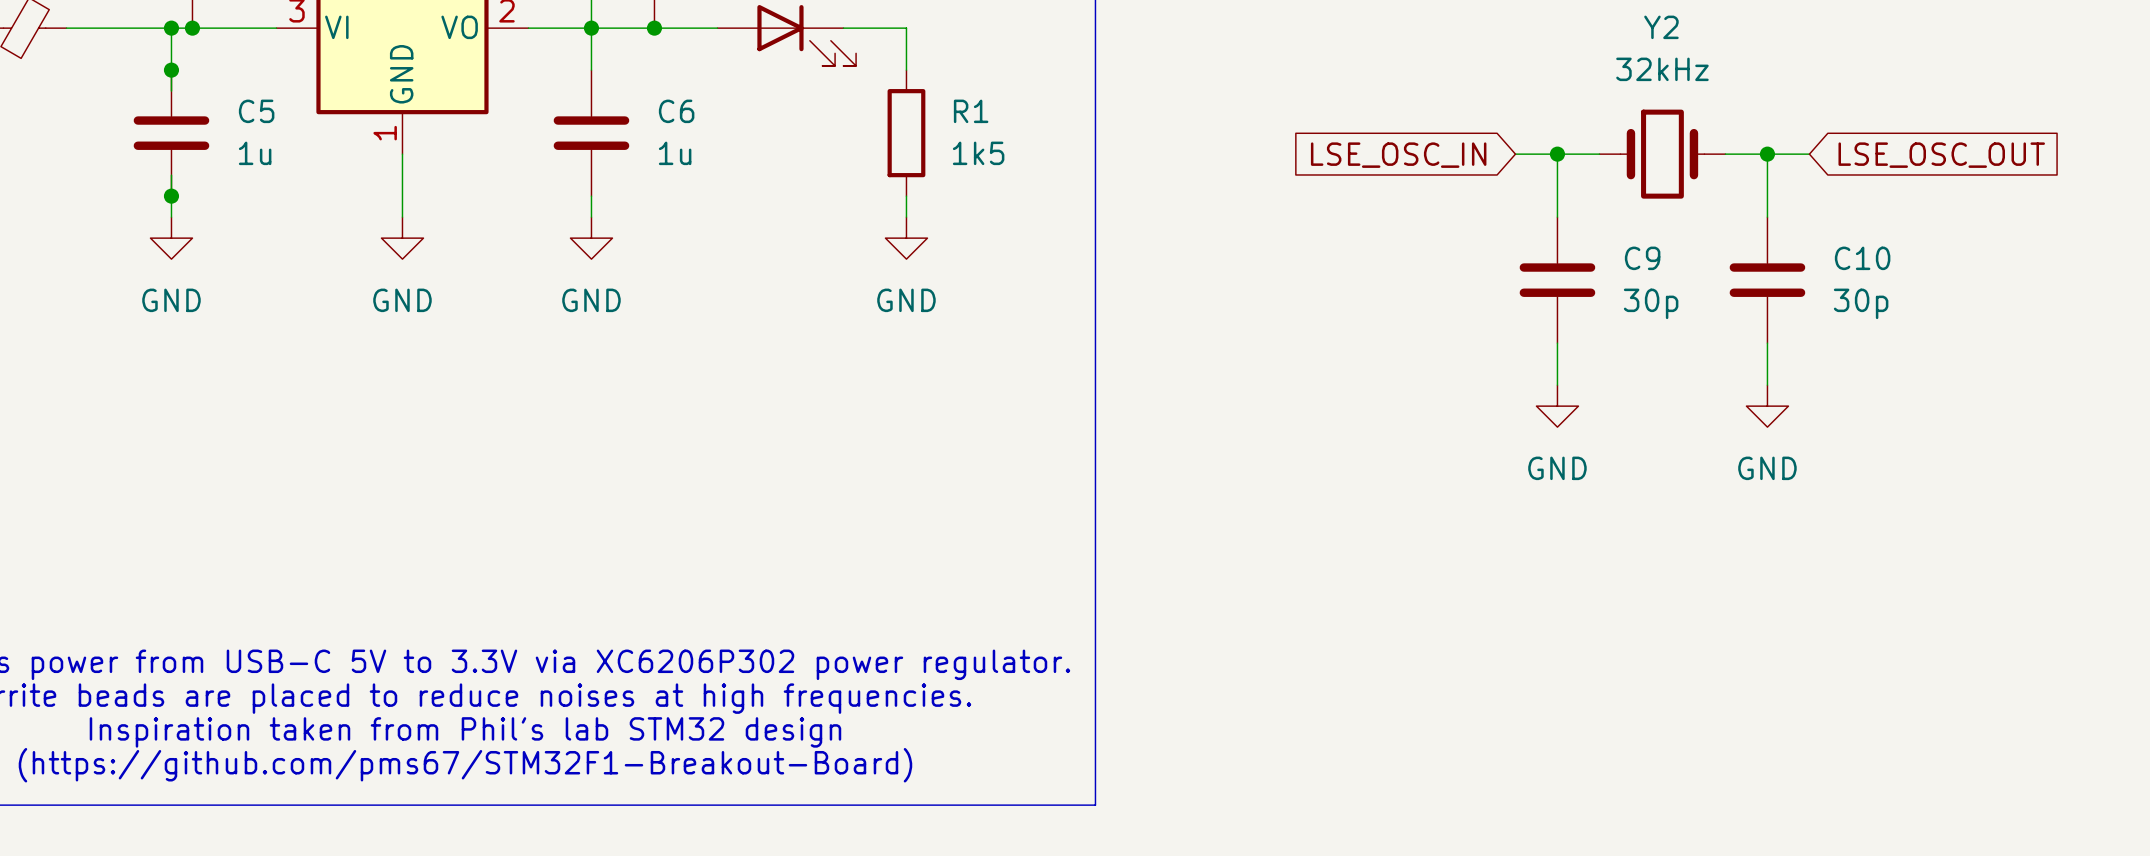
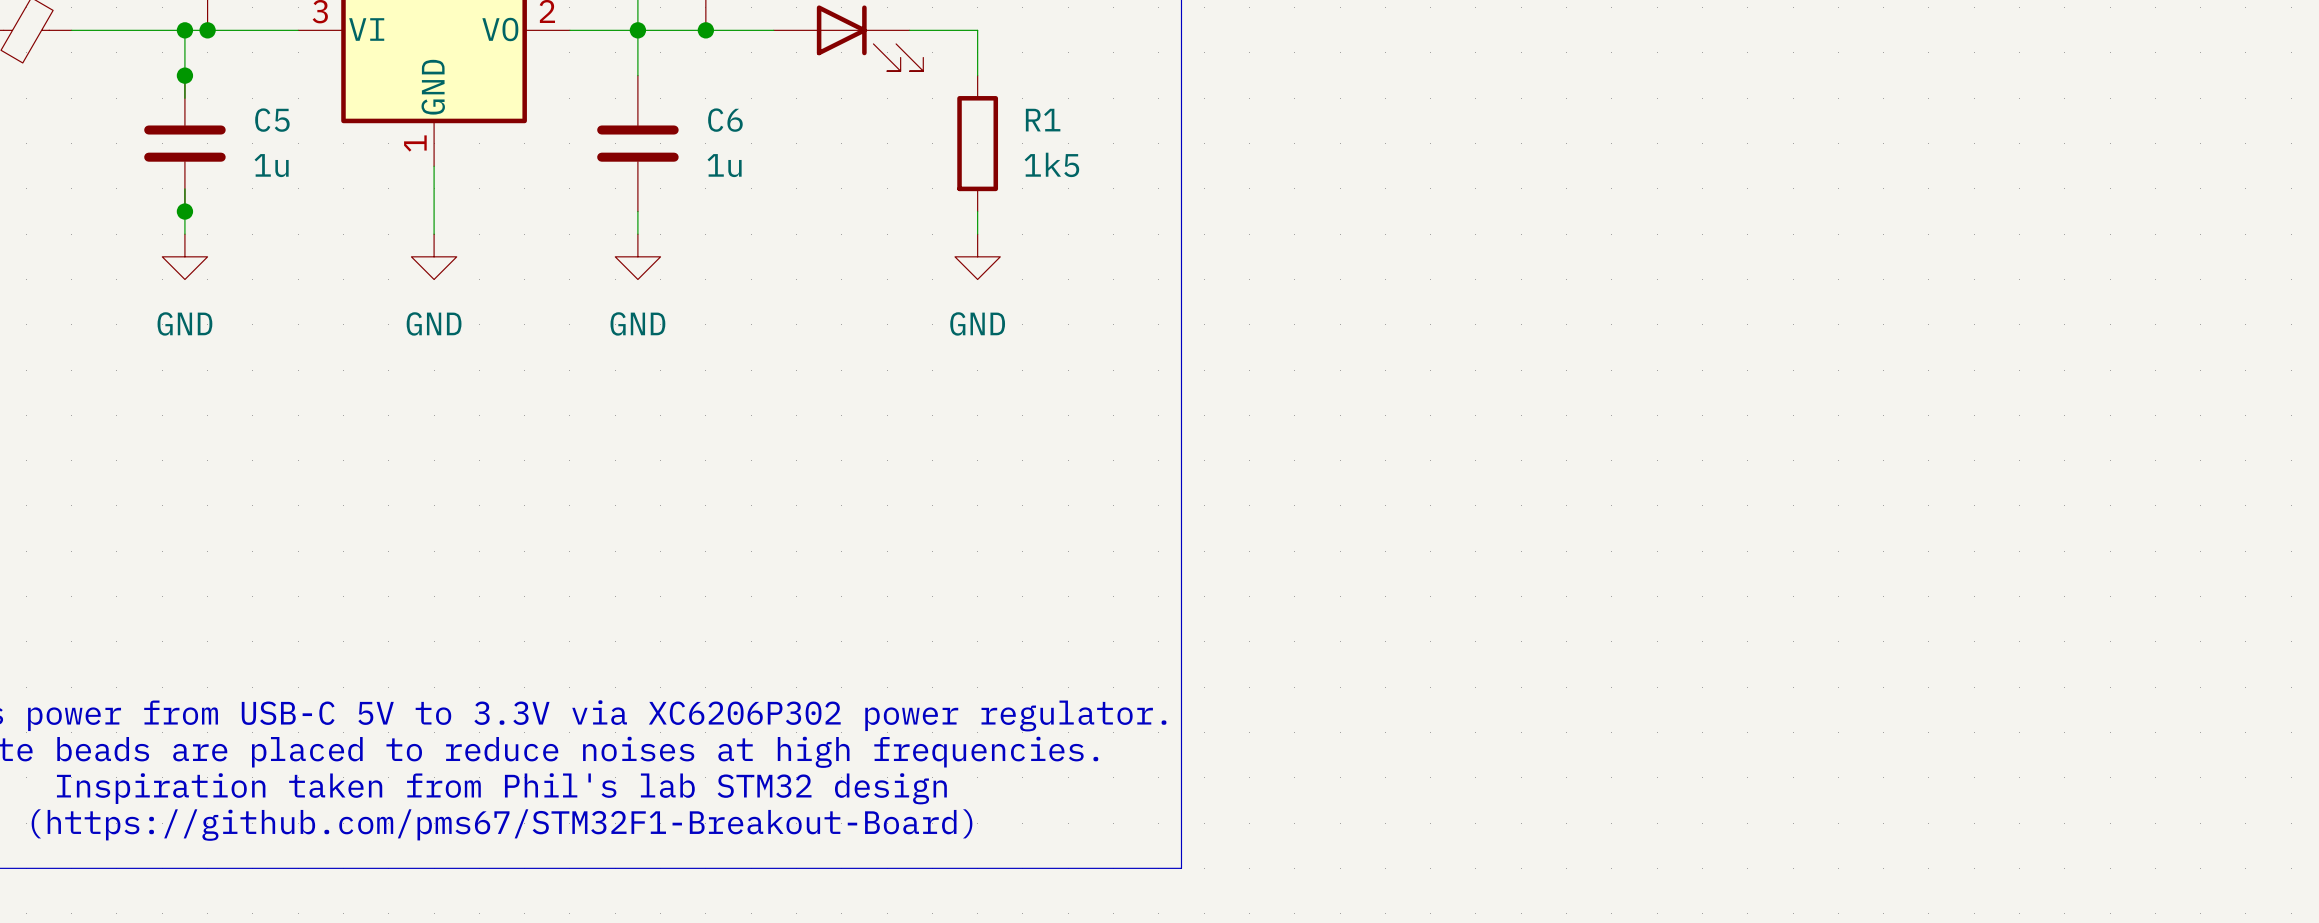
wire: (1515, 154) (1599, 154) -> none
wire: (1557, 154) (1557, 217) -> none
junction: (1557, 154) -> none
Y2: 32kHz (1662, 154) -> none
wire: (1725, 154) (1809, 154) -> none
wire: (1767, 154) (1767, 217) -> none
junction: (1767, 154) -> none
global label: LSE_OSC_IN (1398, 155) -> none
global label: LSE_OSC_OUT (1941, 155) -> none
C9: 30p (1557, 280) -> none
C10: 30p (1767, 280) -> none
wire: (1557, 343) (1557, 385) -> none
wire: (1767, 343) (1767, 385) -> none
power symbol: GND (1557, 406) -> none
power symbol: GND (1767, 406) -> none

